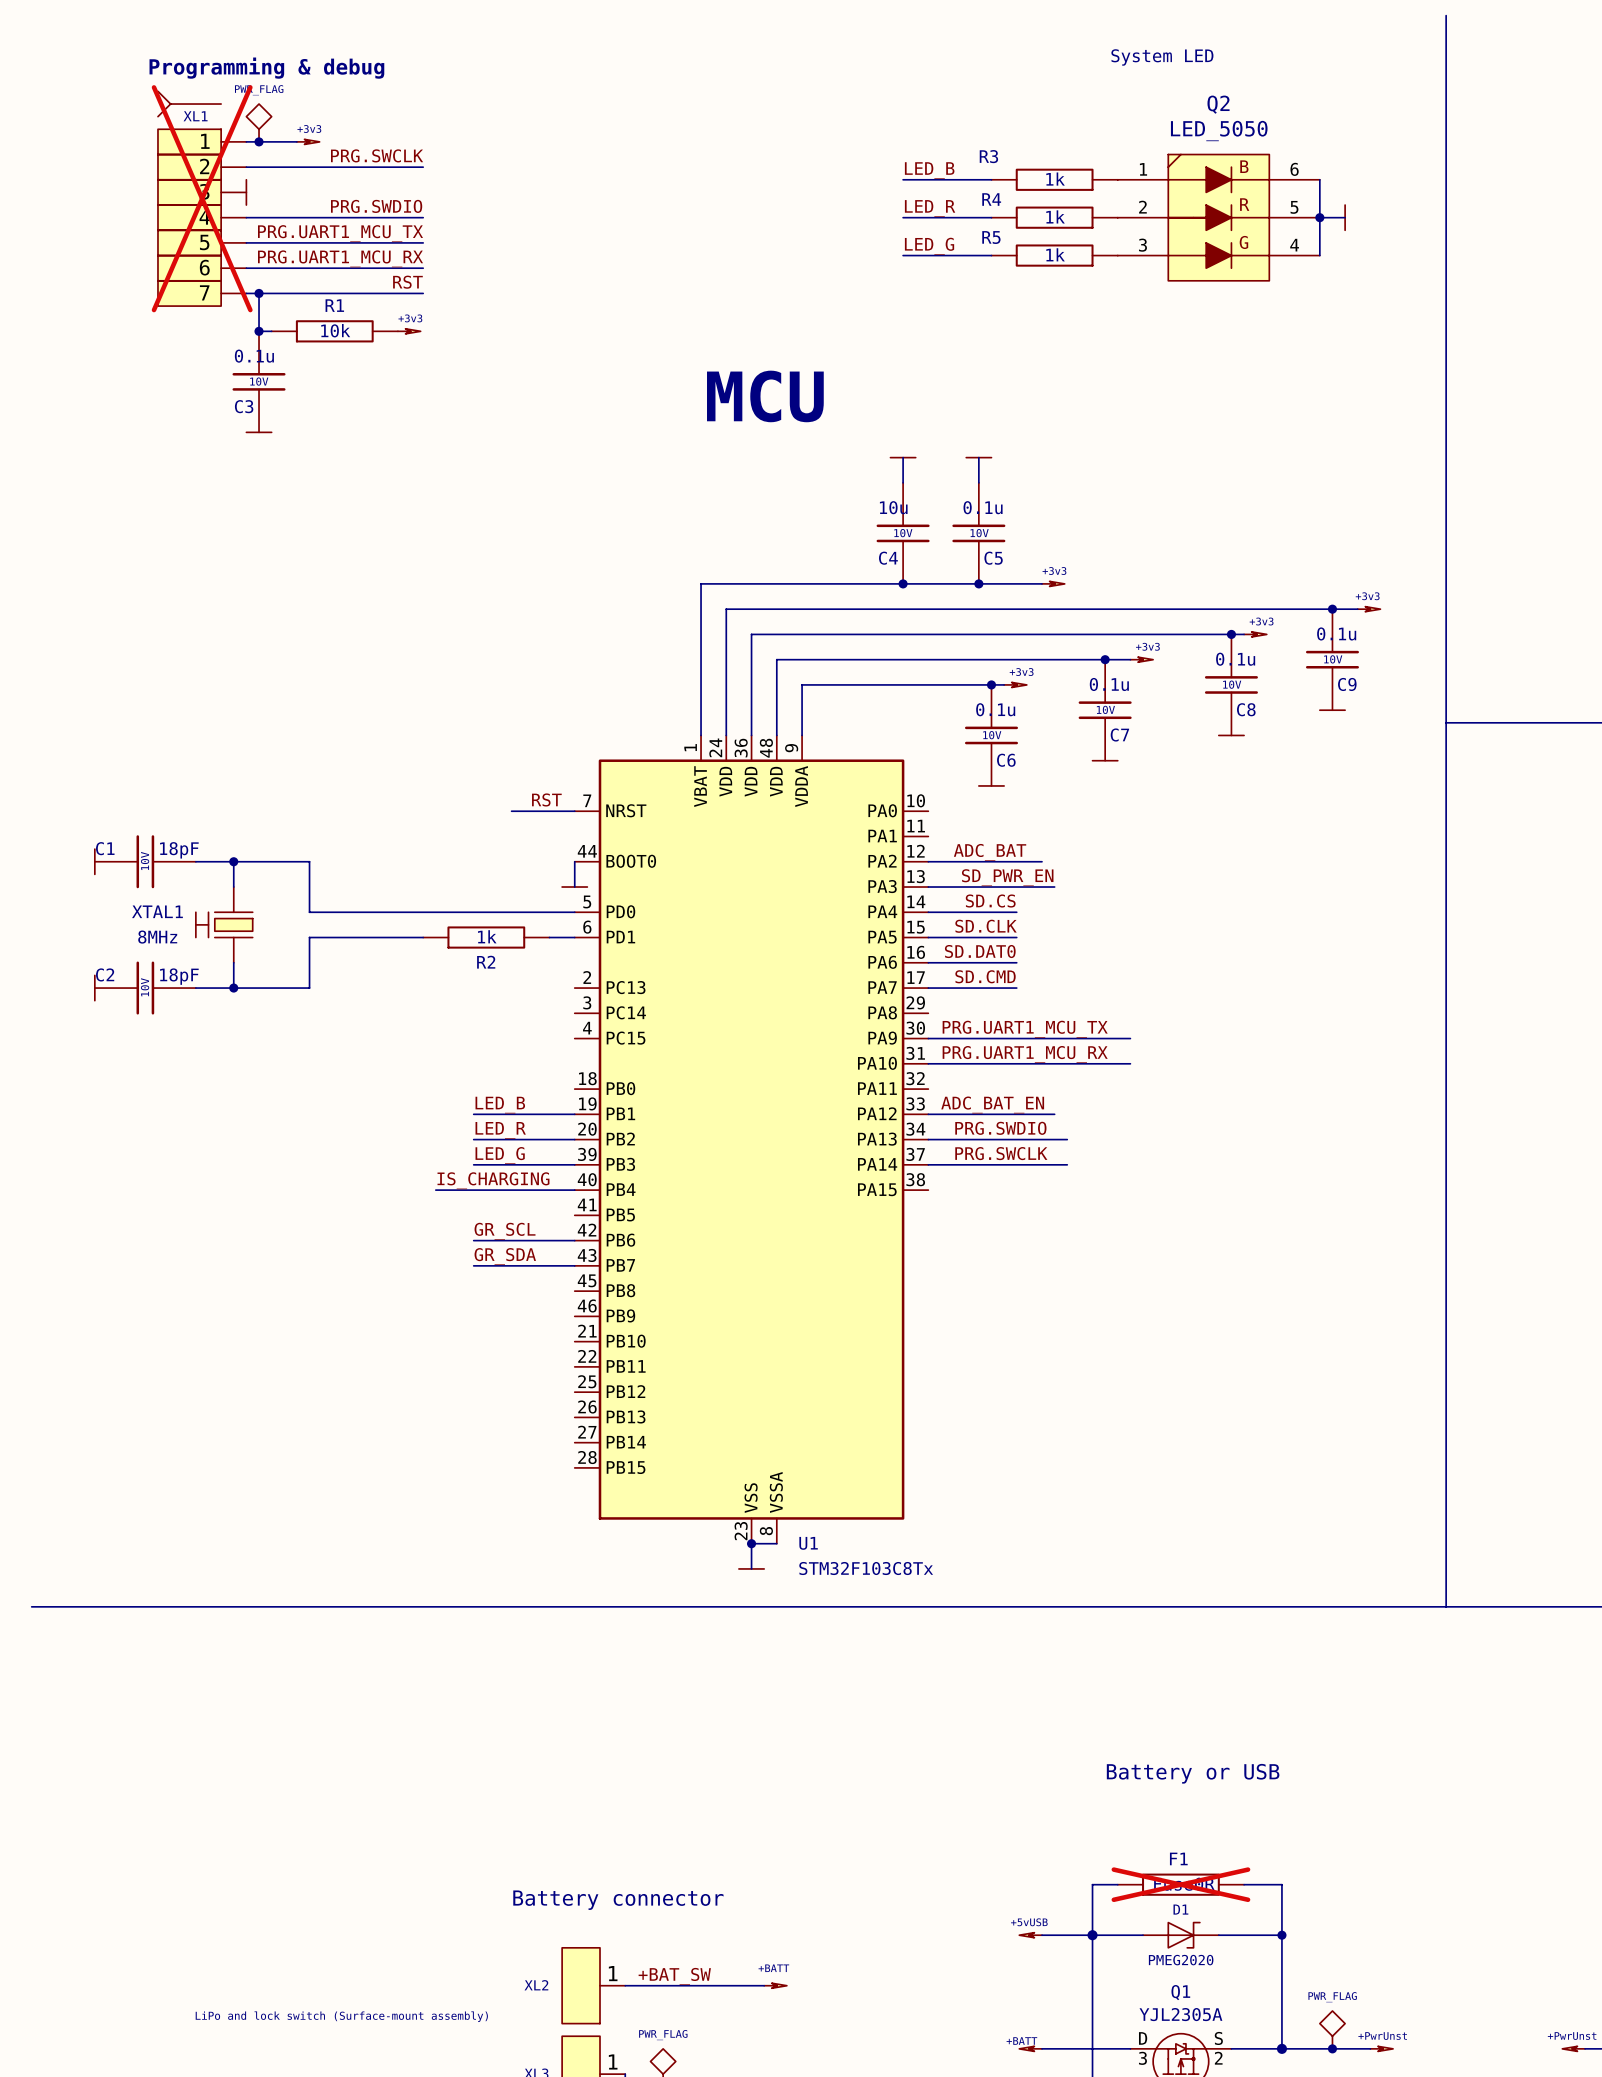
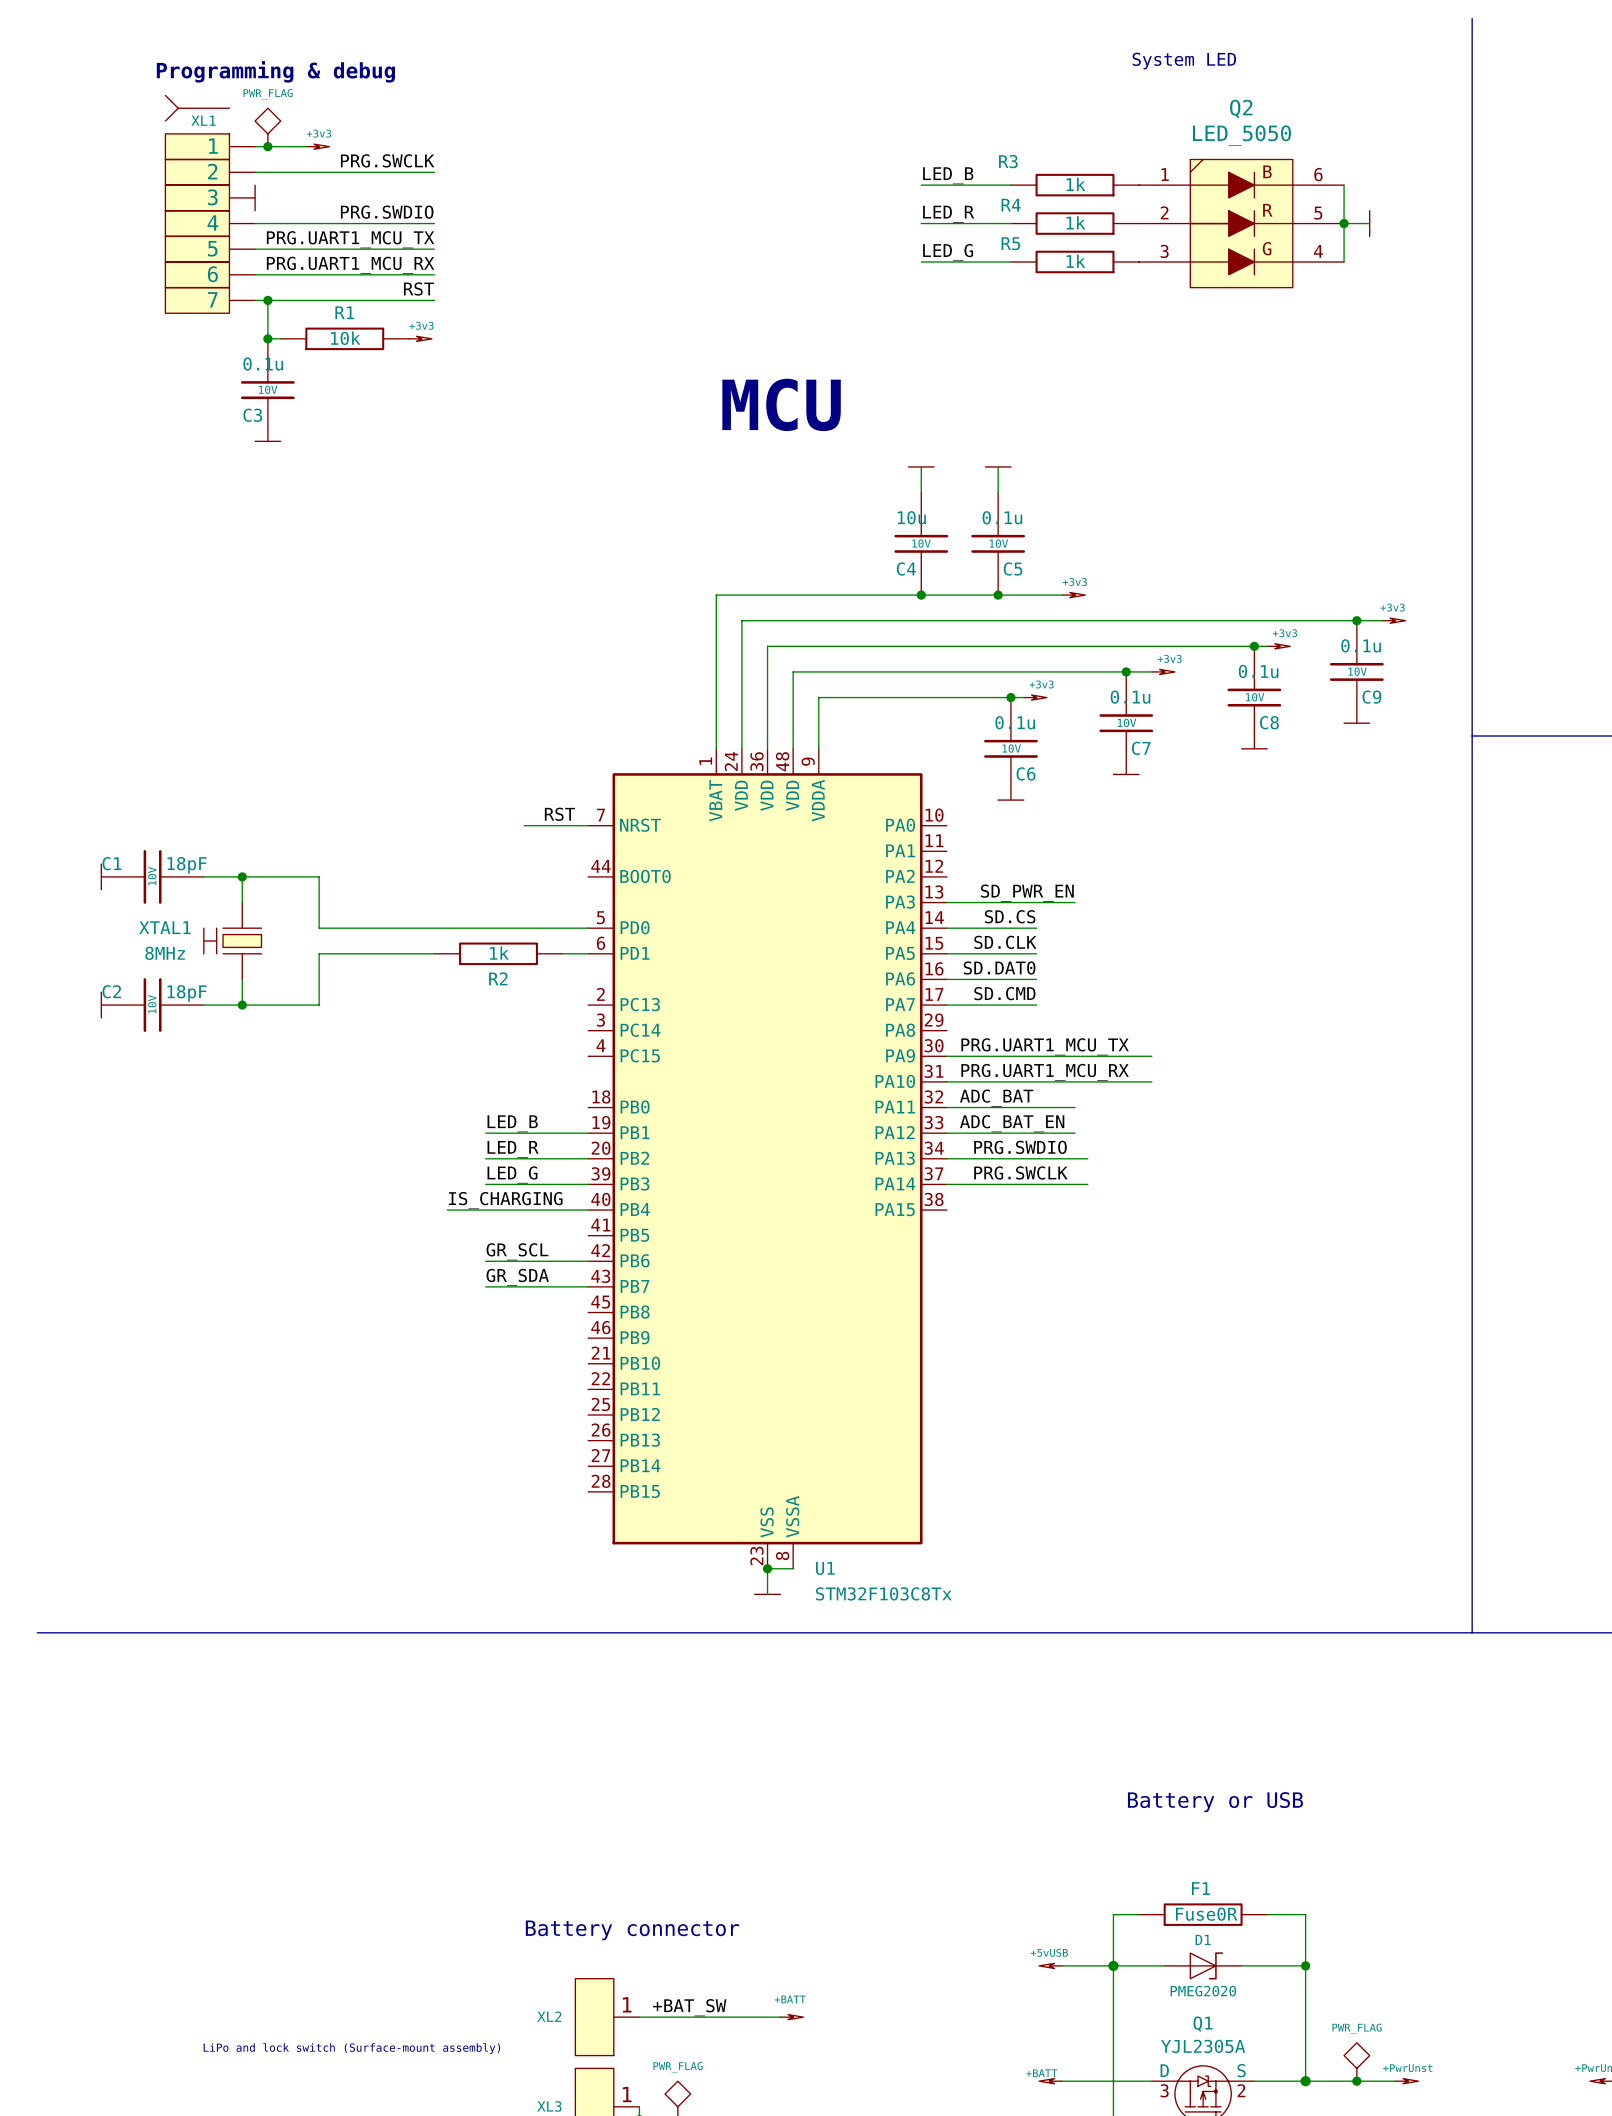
XL1 do-not-place cross: (202, 198) -> none
label position: ADC_BAT (990, 852) -> ADC_BAT (996, 1098)
wire: (574, 861) (574, 887) -> none
wire: (928, 861) (1042, 861) -> none
power symbol: (574, 887) -> none
wire: none -> (946, 1107) (1075, 1107)
F1 do-not-place cross: (1180, 1884) -> none

